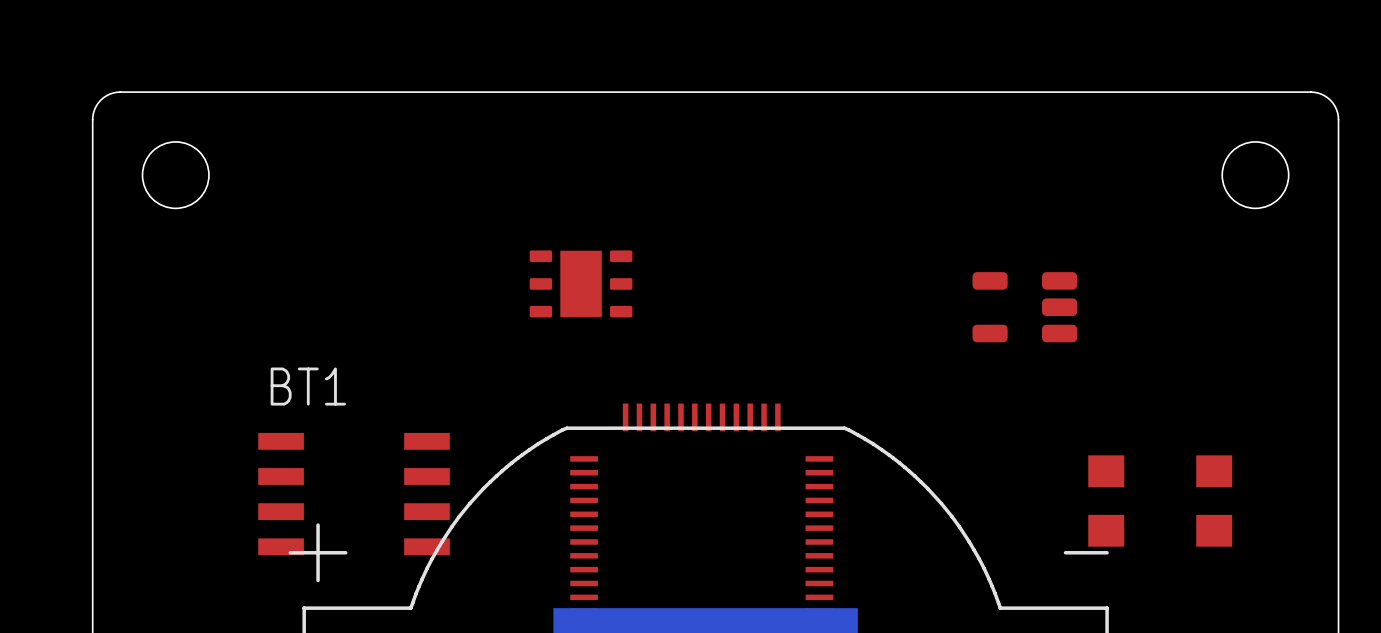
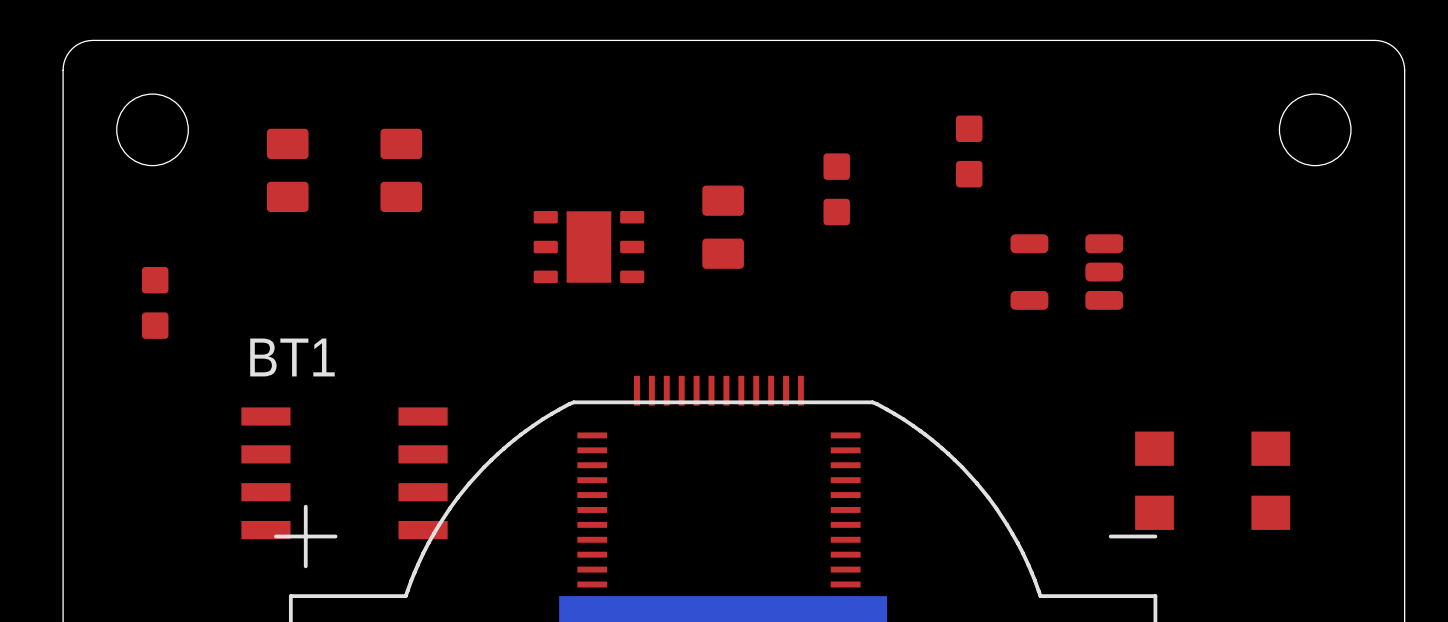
part: none -> (969, 151)
part: none -> (287, 170)
part: none -> (401, 170)
part: none -> (836, 189)
part: none -> (723, 227)
part: none -> (155, 302)

